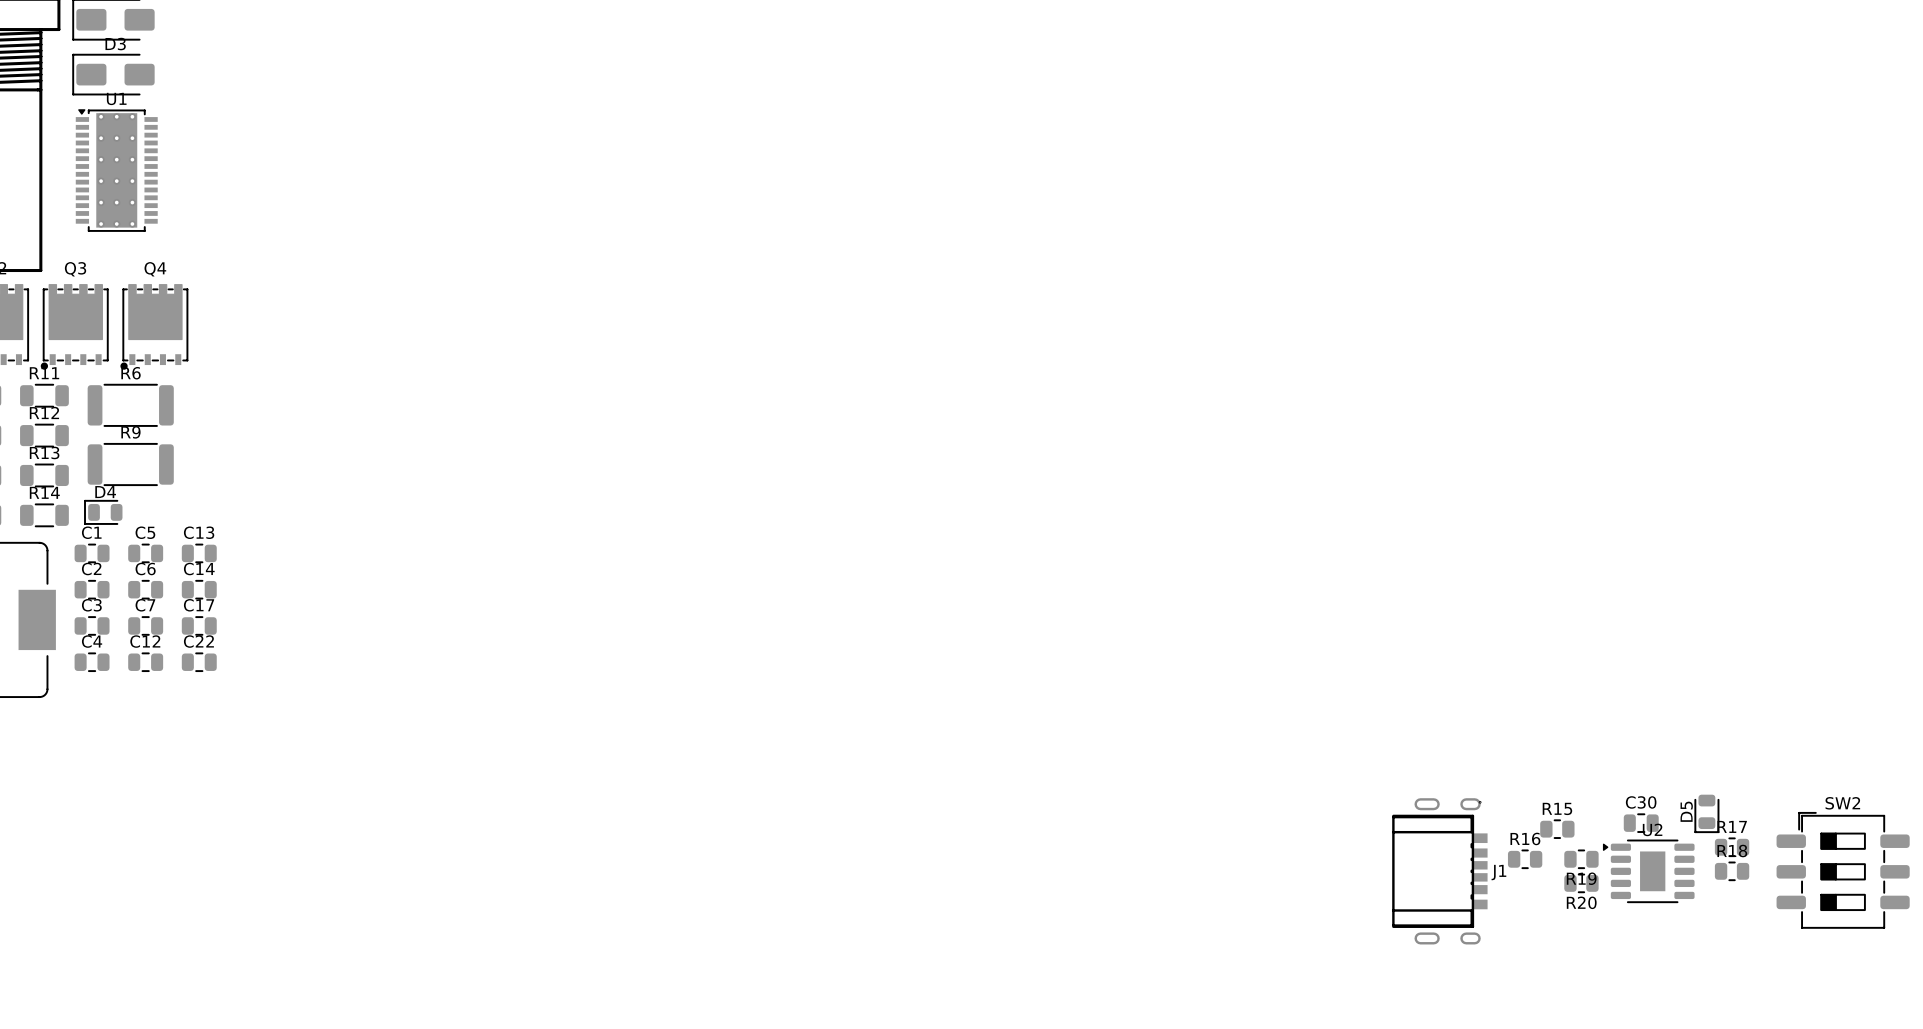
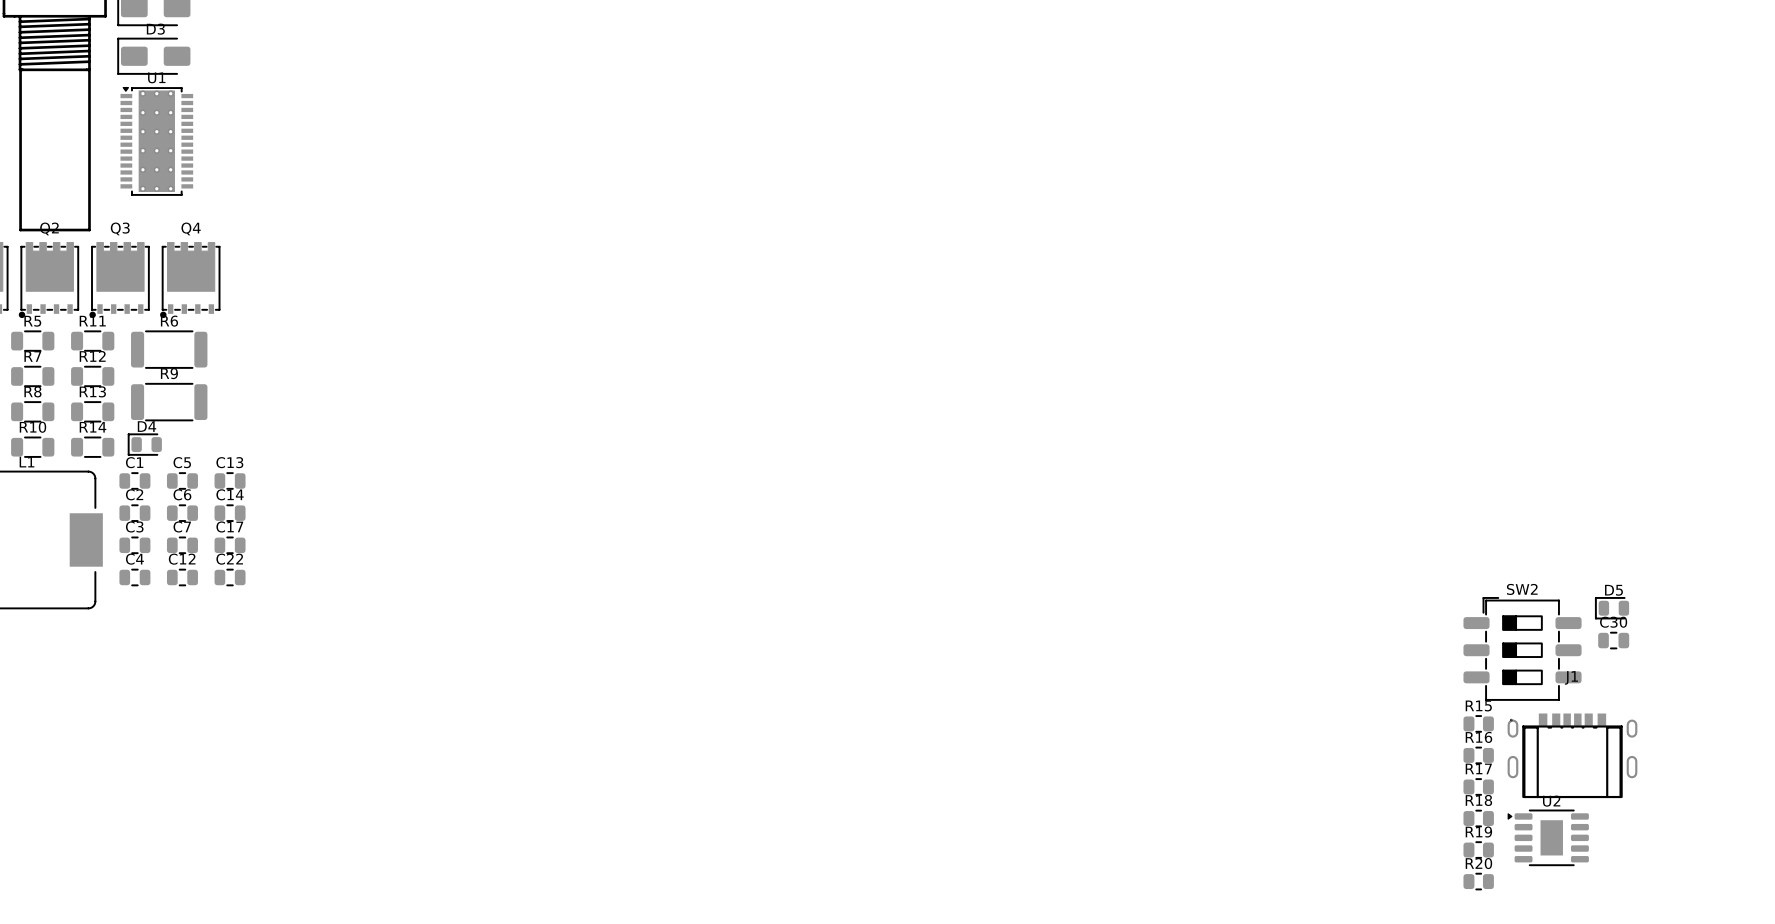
D5 rotation: 0° (1706, 813) -> 90° clockwise (1612, 608)
D5 position: (1706, 813) -> (1612, 608)
C30 position: (1641, 823) -> (1613, 640)
R15 position: (1557, 829) -> (1478, 723)
R17 position: (1732, 847) -> (1478, 786)
R16 position: (1525, 859) -> (1478, 755)
R19 position: (1581, 859) -> (1478, 850)
SW2 position: (1843, 870) -> (1522, 648)
J1 rotation: 0° (1439, 871) -> 90° counterclockwise (1572, 755)
J1 position: (1439, 871) -> (1572, 755)
U2 position: (1648, 871) -> (1548, 837)
R18 position: (1732, 871) -> (1478, 818)
J1 name position: J1 (1498, 872) -> J1 (1571, 677)
R19 name position: R19 (1581, 878) -> R19 (1478, 832)
R20 position: (1581, 883) -> (1478, 881)
R20 name position: R20 (1581, 902) -> R20 (1478, 863)

